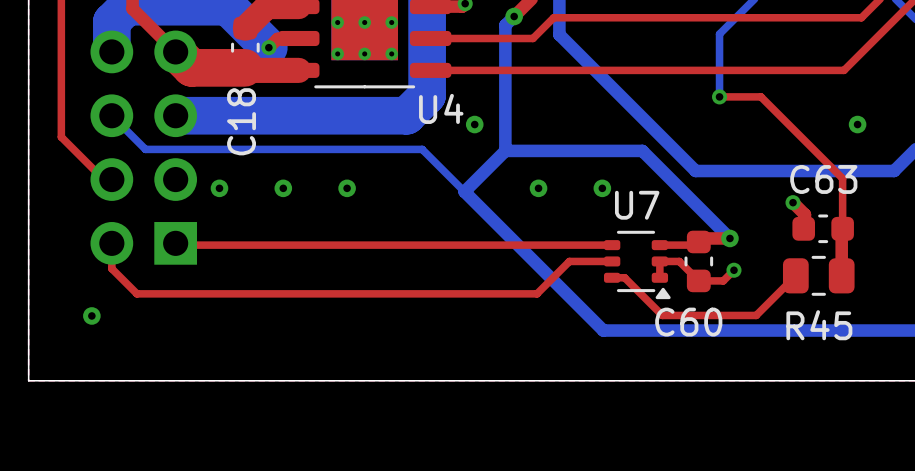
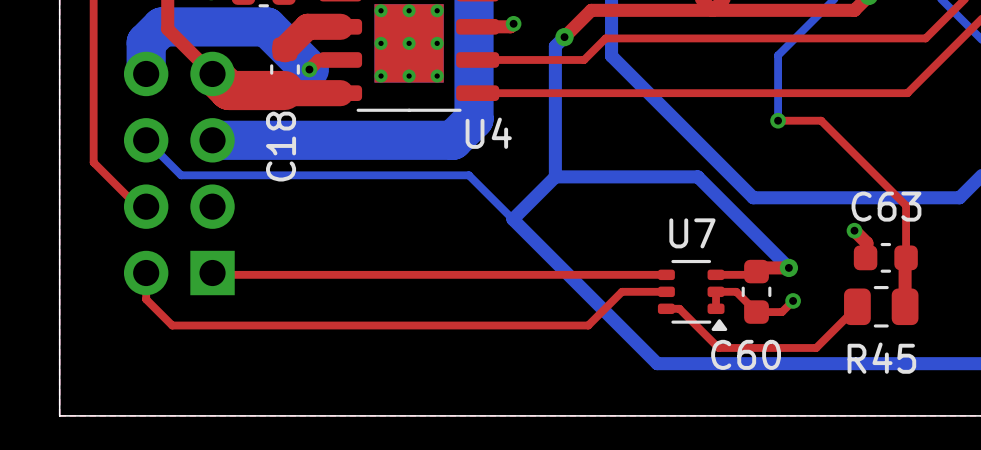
via: (474, 124) -> none
via: (857, 124) -> none
via: (219, 188) -> none
via: (283, 188) -> none
via: (347, 188) -> none
via: (538, 188) -> none
via: (602, 188) -> none
via: (91, 315) -> none

